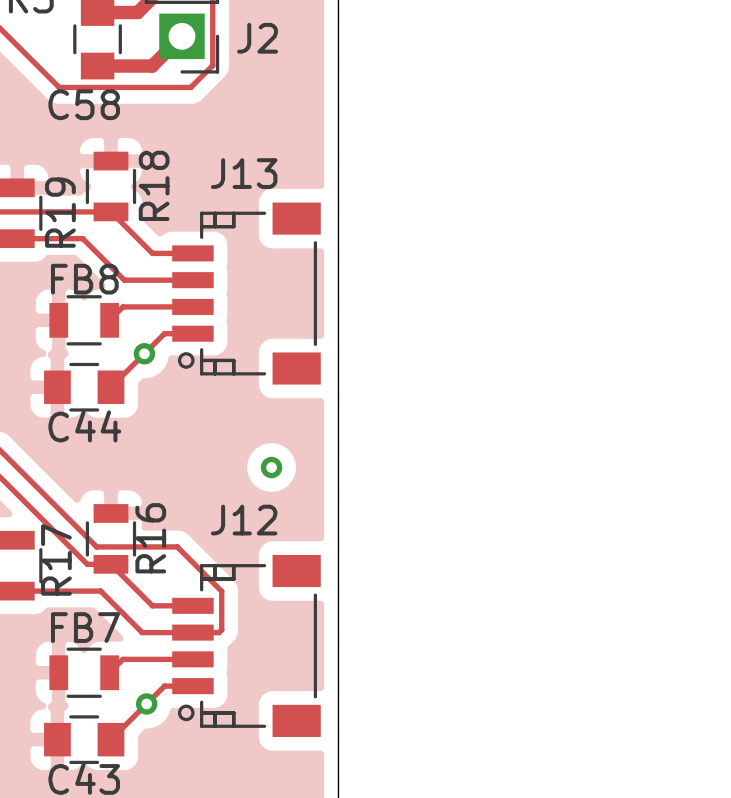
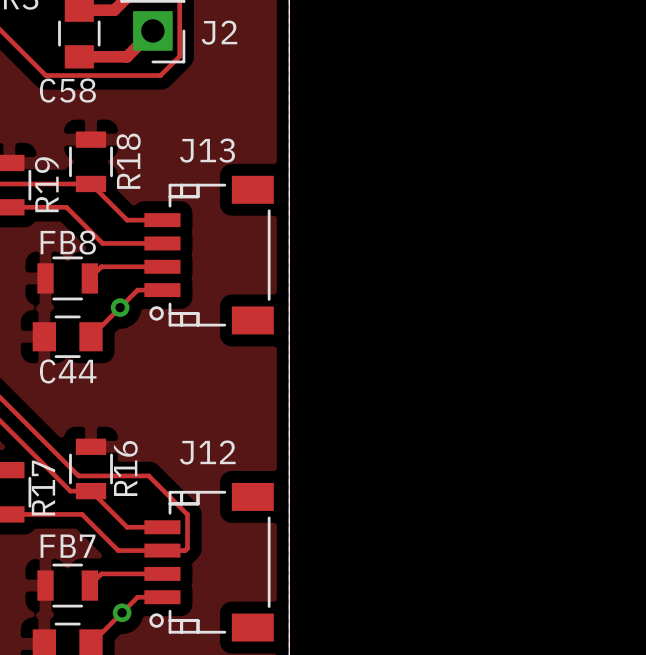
via: (271, 467) -> none

